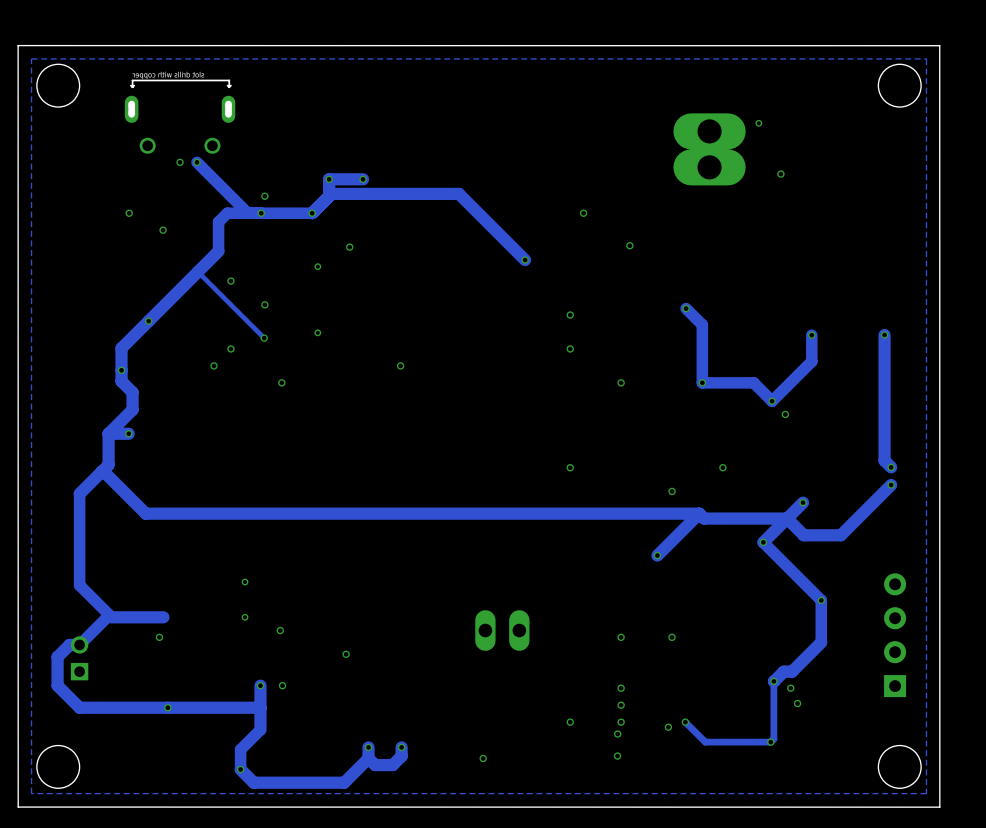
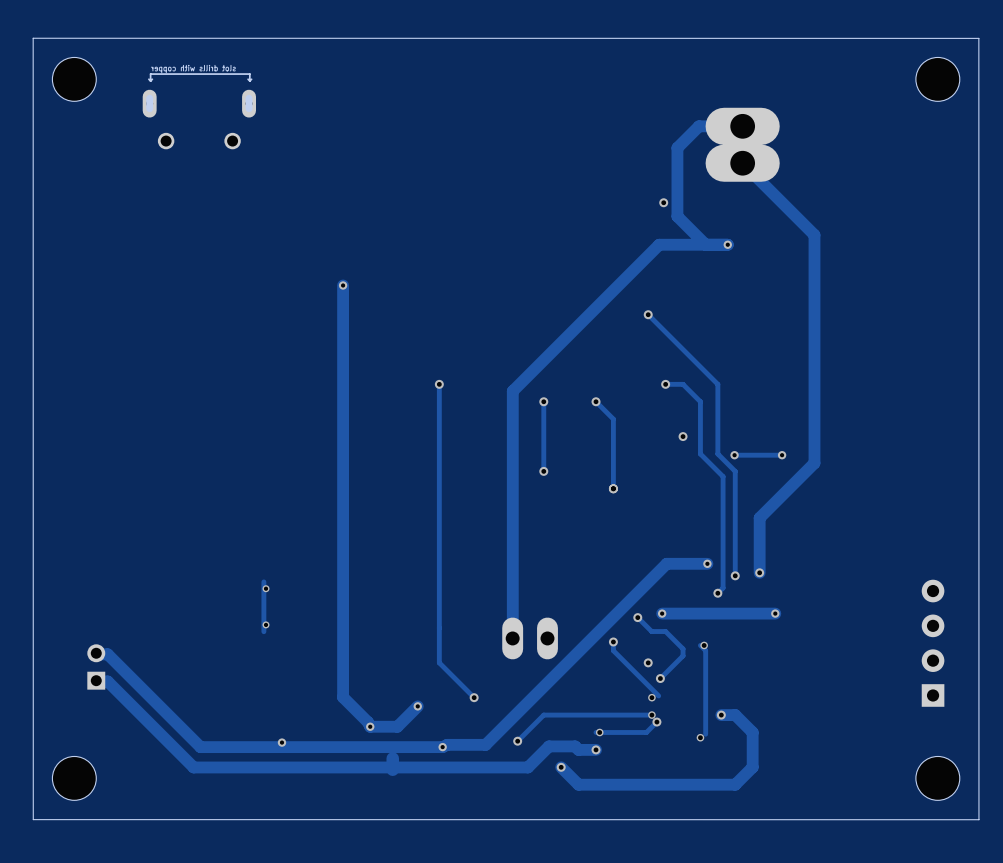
zone outline: (926, 58) (926, 793) (31, 793) (31, 58) (926, 58) -> none
via: (758, 123) -> none
track: none -> (742, 126) (699, 126) (677, 147) (677, 216) (705, 244)
via: (180, 162) -> none
track: (197, 162) (247, 213) -> none
via: (197, 162) -> none
track: none -> (742, 163) (814, 235) (814, 463) (759, 517) (759, 572)
via: (780, 174) -> none
via: (329, 179) -> none
track: (363, 179) (329, 179) (329, 196) -> none
via: (363, 179) -> none
via: (264, 196) -> none
via: none -> (663, 202)
via: (129, 213) -> none
via: (261, 213) -> none
via: (312, 213) -> none
via: (583, 213) -> none
via: (163, 230) -> none
via: (629, 245) -> none
track: none -> (727, 244) (659, 244) (512, 391) (512, 638)
via: none -> (727, 244)
via: (349, 247) -> none
track: (525, 260) (458, 193) (331, 193) (312, 213) (227, 213) (218, 222) (218, 251) (121, 348) (121, 381) (132, 392) (132, 409) (108, 433) -> none
via: (525, 260) -> none
via: (317, 266) -> none
track: (197, 271) (264, 338) -> none
via: (230, 281) -> none
track: none -> (343, 285) (343, 697) (370, 726) (397, 726) (417, 706)
via: none -> (343, 285)
via: (264, 304) -> none
track: (686, 308) (702, 324) (702, 382) (753, 382) (772, 401) (811, 361) (811, 335) -> none
via: (686, 308) -> none
via: (570, 315) -> none
track: none -> (648, 314) (717, 384) (717, 453) (735, 471) (735, 575)
via: none -> (648, 314)
via: (148, 321) -> none
via: (317, 332) -> none
via: (811, 335) -> none
track: (884, 335) (884, 460) (891, 467) -> none
via: (884, 335) -> none
via: (264, 338) -> none
via: (230, 348) -> none
via: (570, 348) -> none
via: (213, 365) -> none
via: (400, 365) -> none
via: (121, 370) -> none
via: (281, 382) -> none
track: none -> (439, 384) (439, 662) (474, 697)
via: none -> (439, 384)
via: (621, 382) -> none
track: none -> (665, 384) (683, 384) (700, 401) (700, 453) (723, 476) (723, 588) (717, 593)
via: none -> (665, 384)
via: (702, 382) -> none
track: none -> (543, 401) (543, 471)
via: none -> (543, 401)
track: none -> (596, 401) (613, 419) (613, 488)
via: none -> (596, 401)
via: (772, 401) -> none
via: (785, 414) -> none
track: (108, 433) (108, 464) (79, 493) (79, 585) (111, 617) -> none
track: (128, 433) (108, 433) -> none
via: (128, 433) -> none
via: none -> (683, 436)
via: none -> (734, 455)
track: none -> (782, 455) (734, 455)
via: none -> (782, 455)
via: none -> (543, 471)
via: (570, 467) -> none
via: (722, 467) -> none
via: (891, 467) -> none
track: (101, 471) (145, 513) (699, 513) -> none
via: none -> (613, 488)
track: (891, 485) (840, 535) (803, 535) (787, 518) (704, 518) (699, 513) -> none
via: (891, 485) -> none
via: (672, 491) -> none
track: (803, 502) (763, 542) -> none
via: (803, 502) -> none
track: (699, 513) (657, 555) -> none
track: (763, 542) (821, 600) (821, 642) (792, 671) (783, 671) (773, 681) (773, 739) (770, 742) (705, 742) (685, 722) -> none
via: (763, 542) -> none
via: (657, 555) -> none
track: none -> (707, 563) (666, 563) (485, 744) (447, 744) (442, 747) (200, 747) (107, 654) (96, 653)
via: none -> (707, 563)
via: none -> (759, 572)
via: none -> (735, 575)
track: none -> (263, 581) (263, 631)
via: none -> (717, 593)
via: (821, 600) -> none
via: none -> (662, 613)
track: none -> (775, 613) (662, 613)
via: none -> (775, 613)
track: none -> (637, 617) (651, 631) (665, 631) (683, 648) (683, 655) (660, 678)
via: none -> (637, 617)
track: (111, 617) (107, 617) (79, 644) (69, 644) (57, 657) (57, 685) (79, 707) (260, 707) -> none
track: (163, 617) (111, 617) -> none
via: (280, 630) -> none
track: none -> (613, 641) (613, 650) (658, 695)
via: none -> (613, 641)
via: (159, 637) -> none
via: (621, 637) -> none
track: none -> (700, 645) (705, 650) (705, 734)
via: (346, 654) -> none
via: none -> (648, 662)
via: none -> (660, 678)
track: none -> (96, 680) (107, 681) (193, 767) (527, 767) (549, 746) (575, 746) (578, 749) (596, 749)
via: (773, 681) -> none
track: (260, 685) (260, 729) (240, 749) (240, 769) (253, 782) (344, 782) (368, 758) (375, 765) (392, 765) (401, 756) (401, 747) -> none
via: (260, 685) -> none
via: (282, 685) -> none
via: none -> (474, 697)
via: (790, 688) -> none
via: none -> (417, 706)
via: (797, 703) -> none
track: none -> (648, 715) (543, 715) (517, 741)
track: none -> (721, 715) (735, 715) (752, 732) (752, 767) (735, 784) (578, 784) (561, 767)
via: none -> (721, 715)
via: (167, 707) -> none
track: none -> (656, 722) (646, 732) (596, 732)
via: none -> (656, 722)
via: none -> (370, 726)
via: (621, 722) -> none
via: (685, 722) -> none
via: none -> (517, 741)
via: none -> (281, 742)
via: (617, 734) -> none
via: none -> (442, 747)
via: none -> (596, 749)
via: (770, 742) -> none
via: (368, 747) -> none
via: (401, 747) -> none
via: none -> (561, 767)
via: (617, 756) -> none
via: (483, 758) -> none
via: (240, 769) -> none

